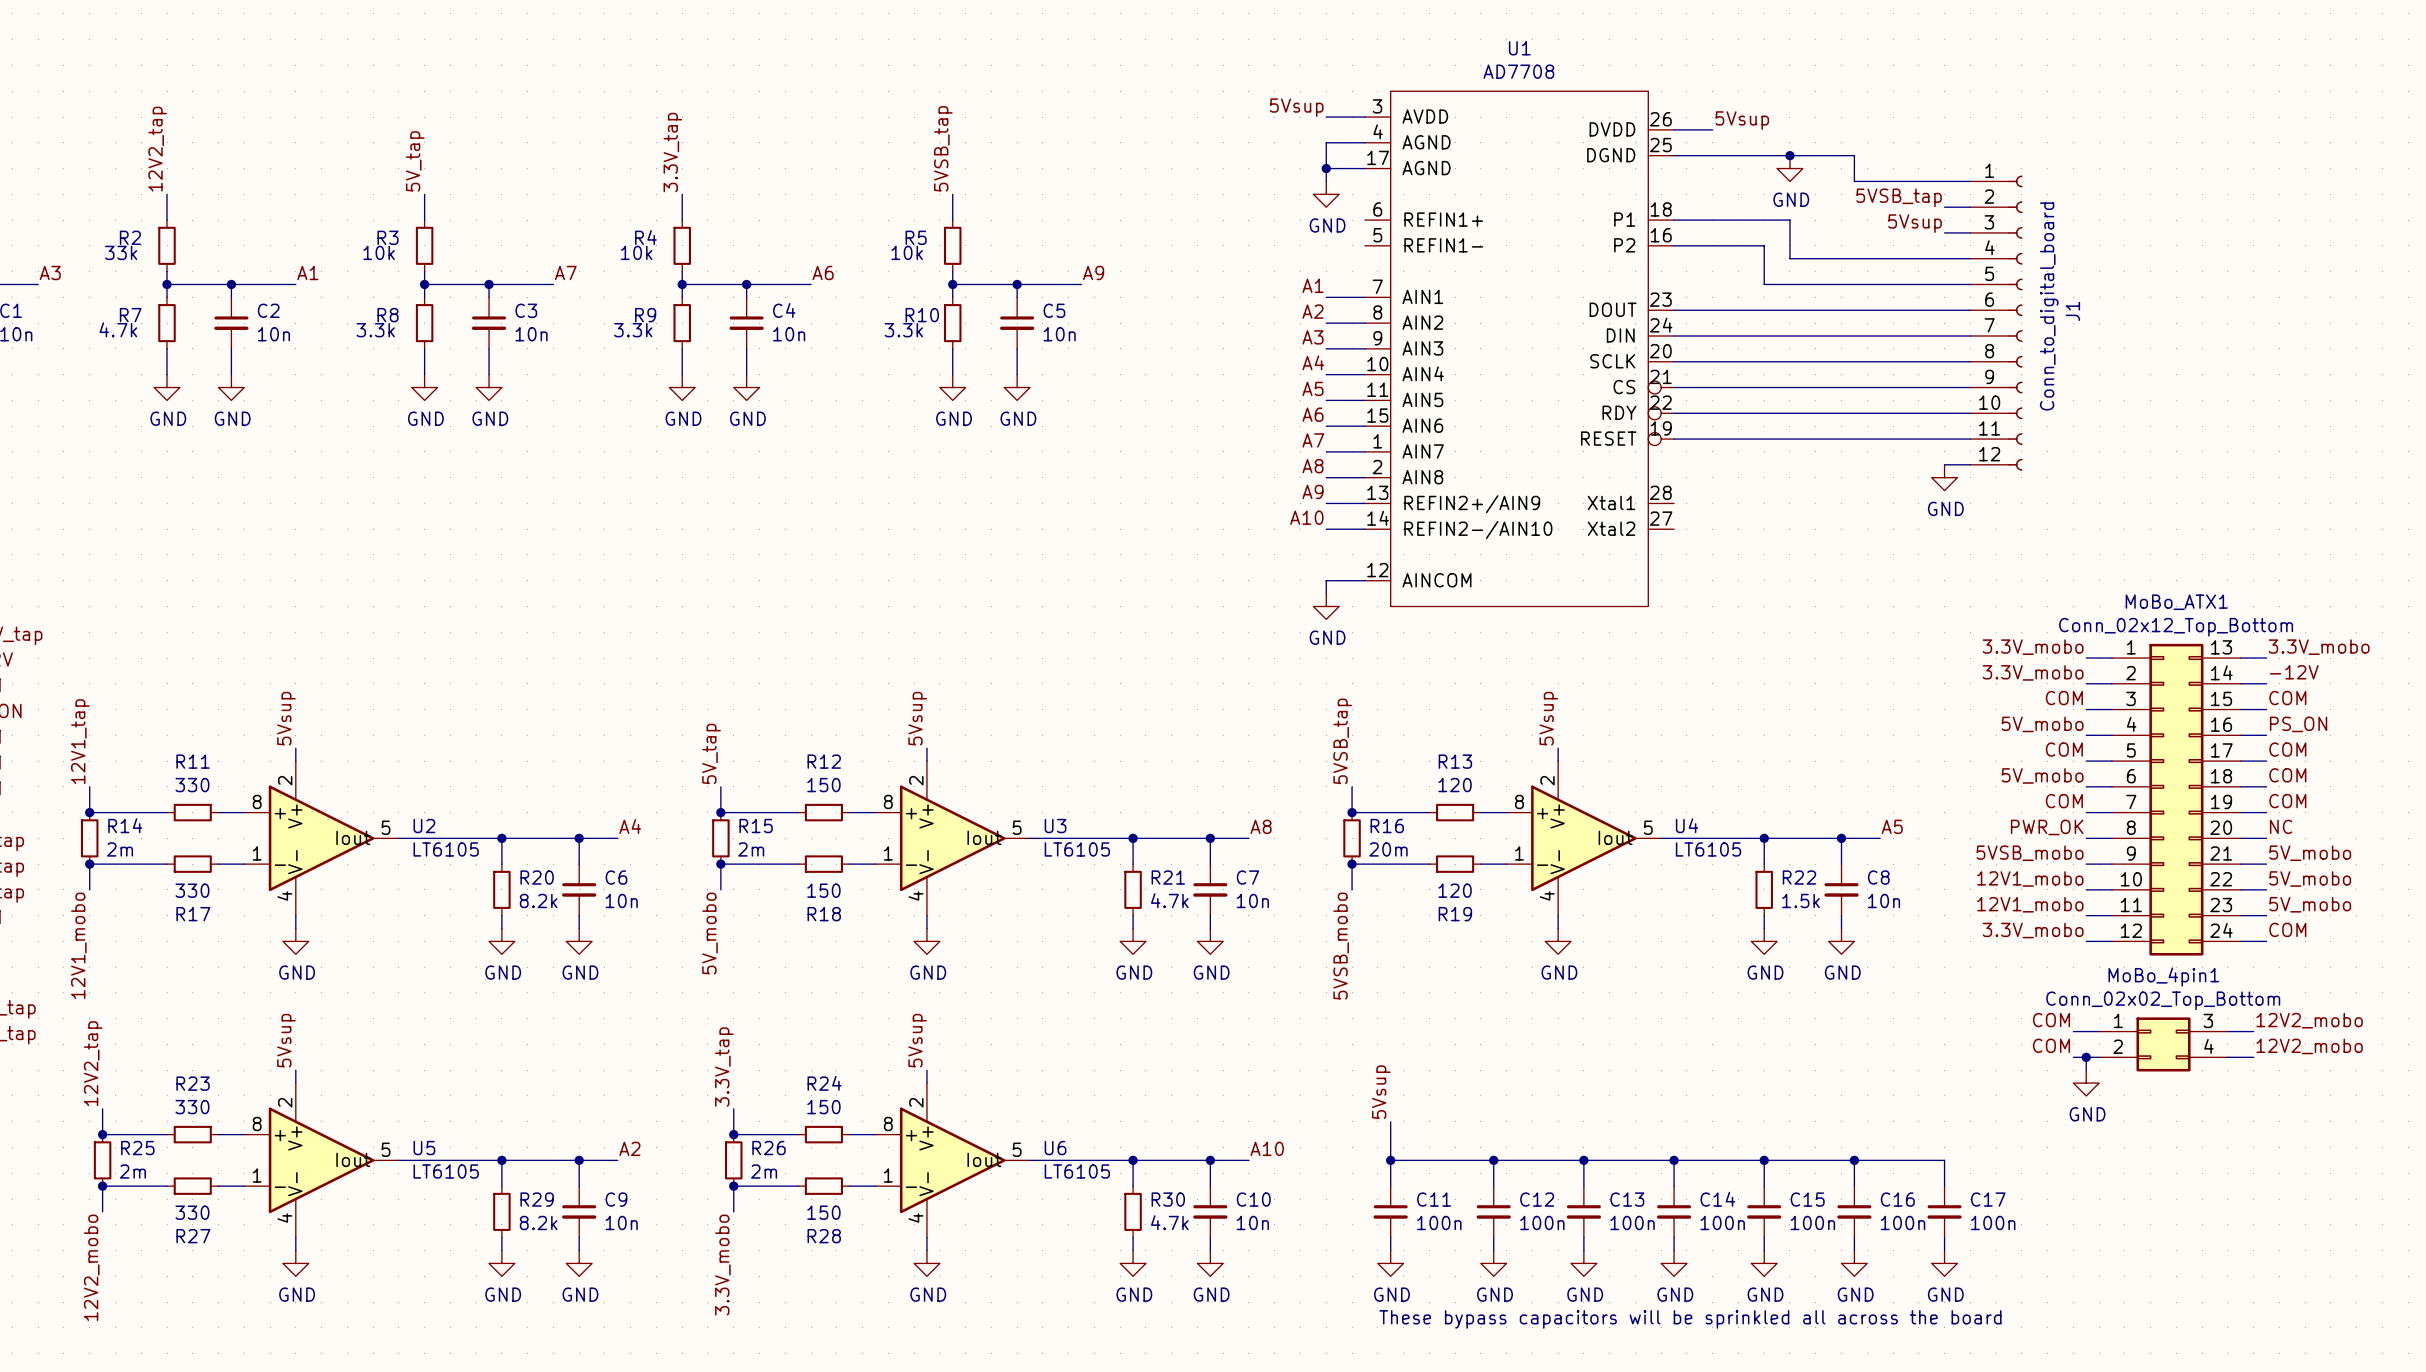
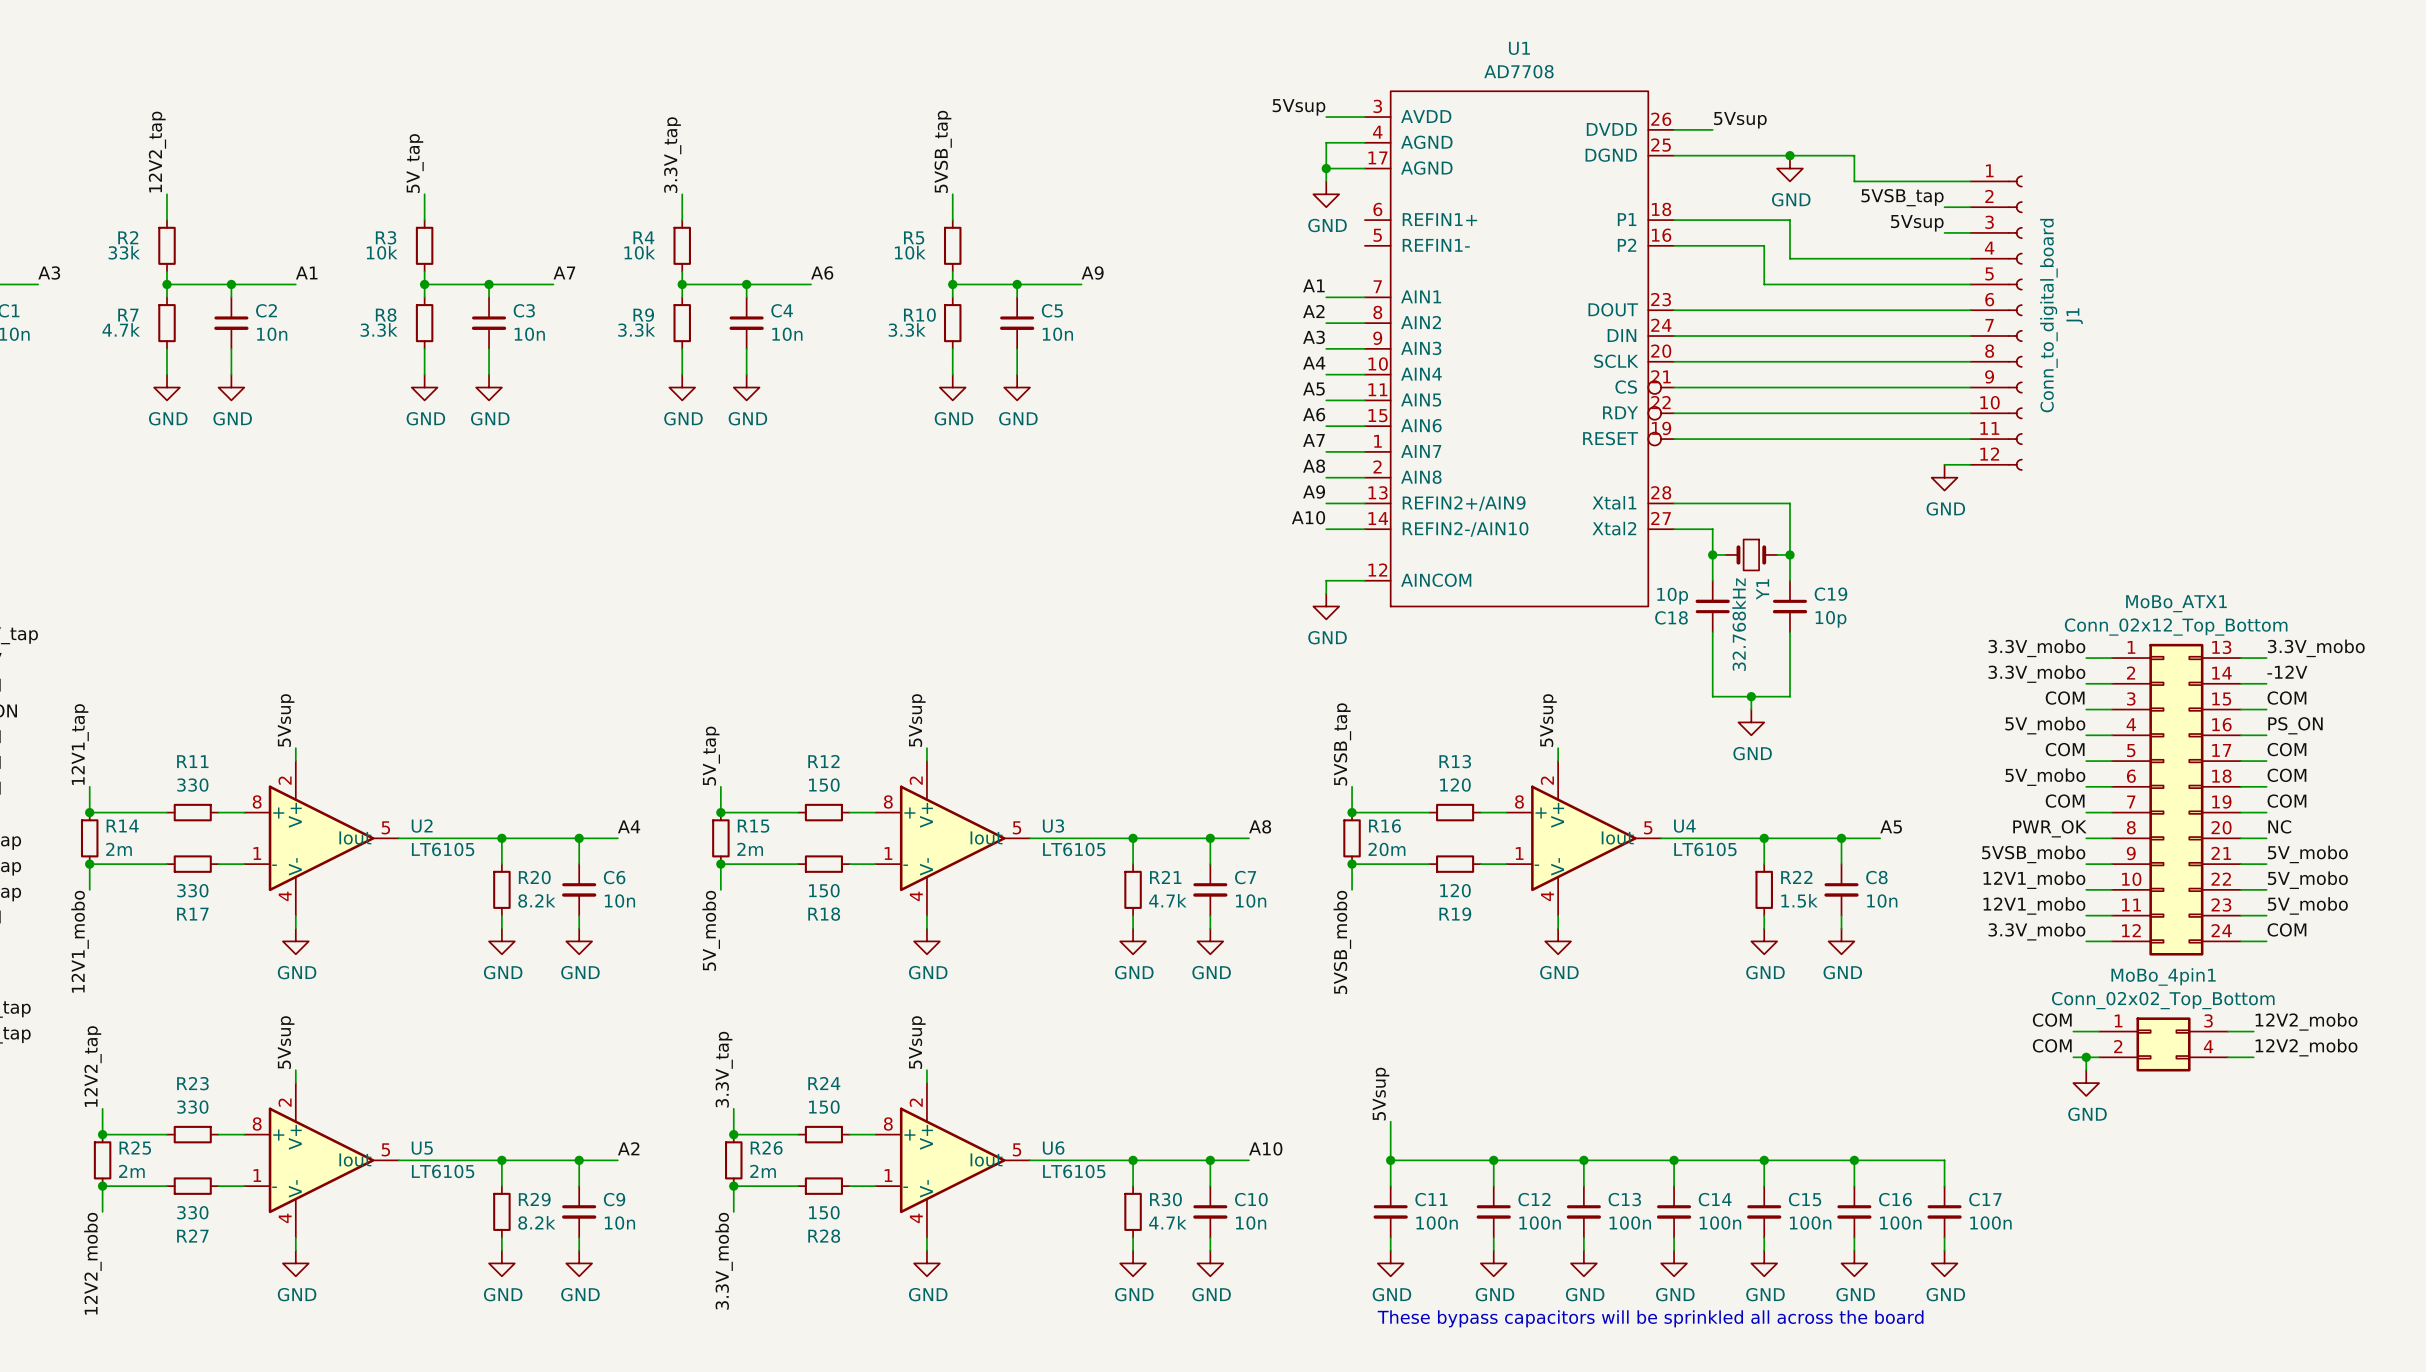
wire: none -> (1674, 503) (1789, 503) (1789, 580)
wire: none -> (1674, 529) (1712, 529) (1712, 580)
wire: none -> (1712, 554) (1725, 554)
junction: none -> (1712, 554)
Y1: none -> 32.768kHz (1751, 554)
wire: none -> (1777, 554) (1789, 554)
junction: none -> (1789, 554)
C18: none -> 10p (1712, 606)
C19: none -> 10p (1789, 606)
wire: none -> (1712, 632) (1712, 696) (1789, 696) (1789, 632)
wire: none -> (1751, 696) (1751, 709)
junction: none -> (1751, 696)
power symbol: none -> GND (1751, 722)

